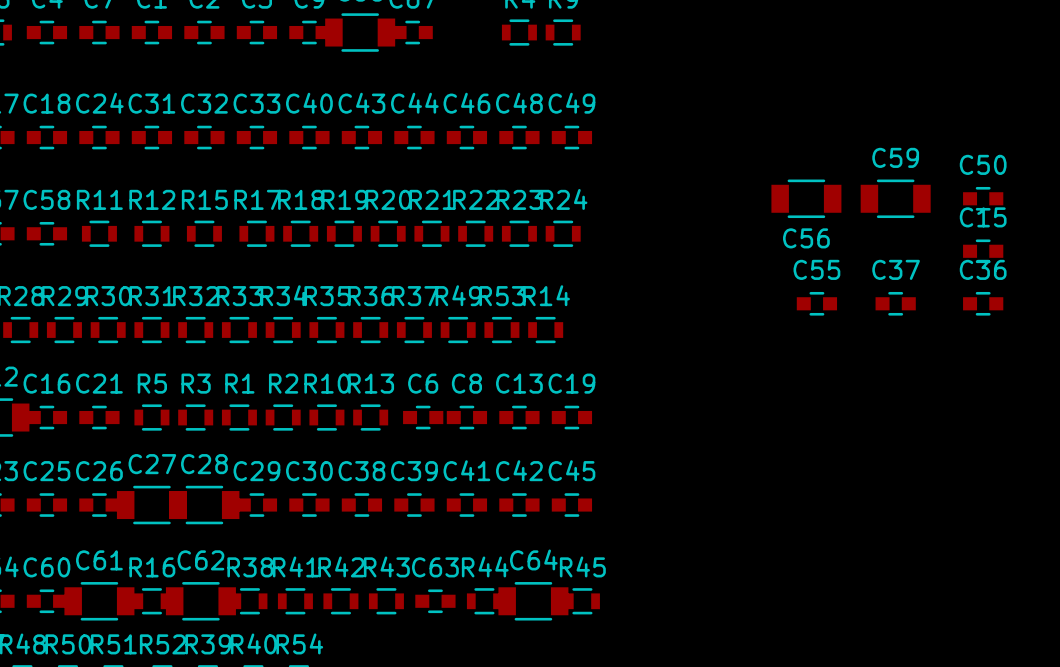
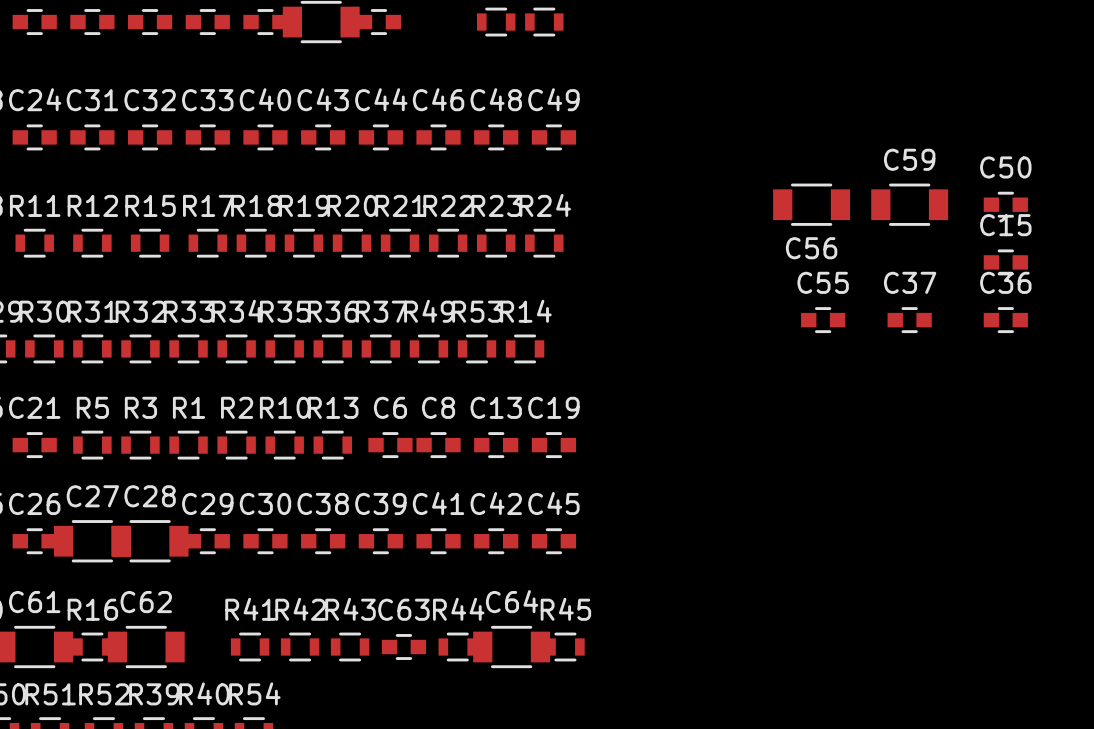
R38: (249, 601) -> none

